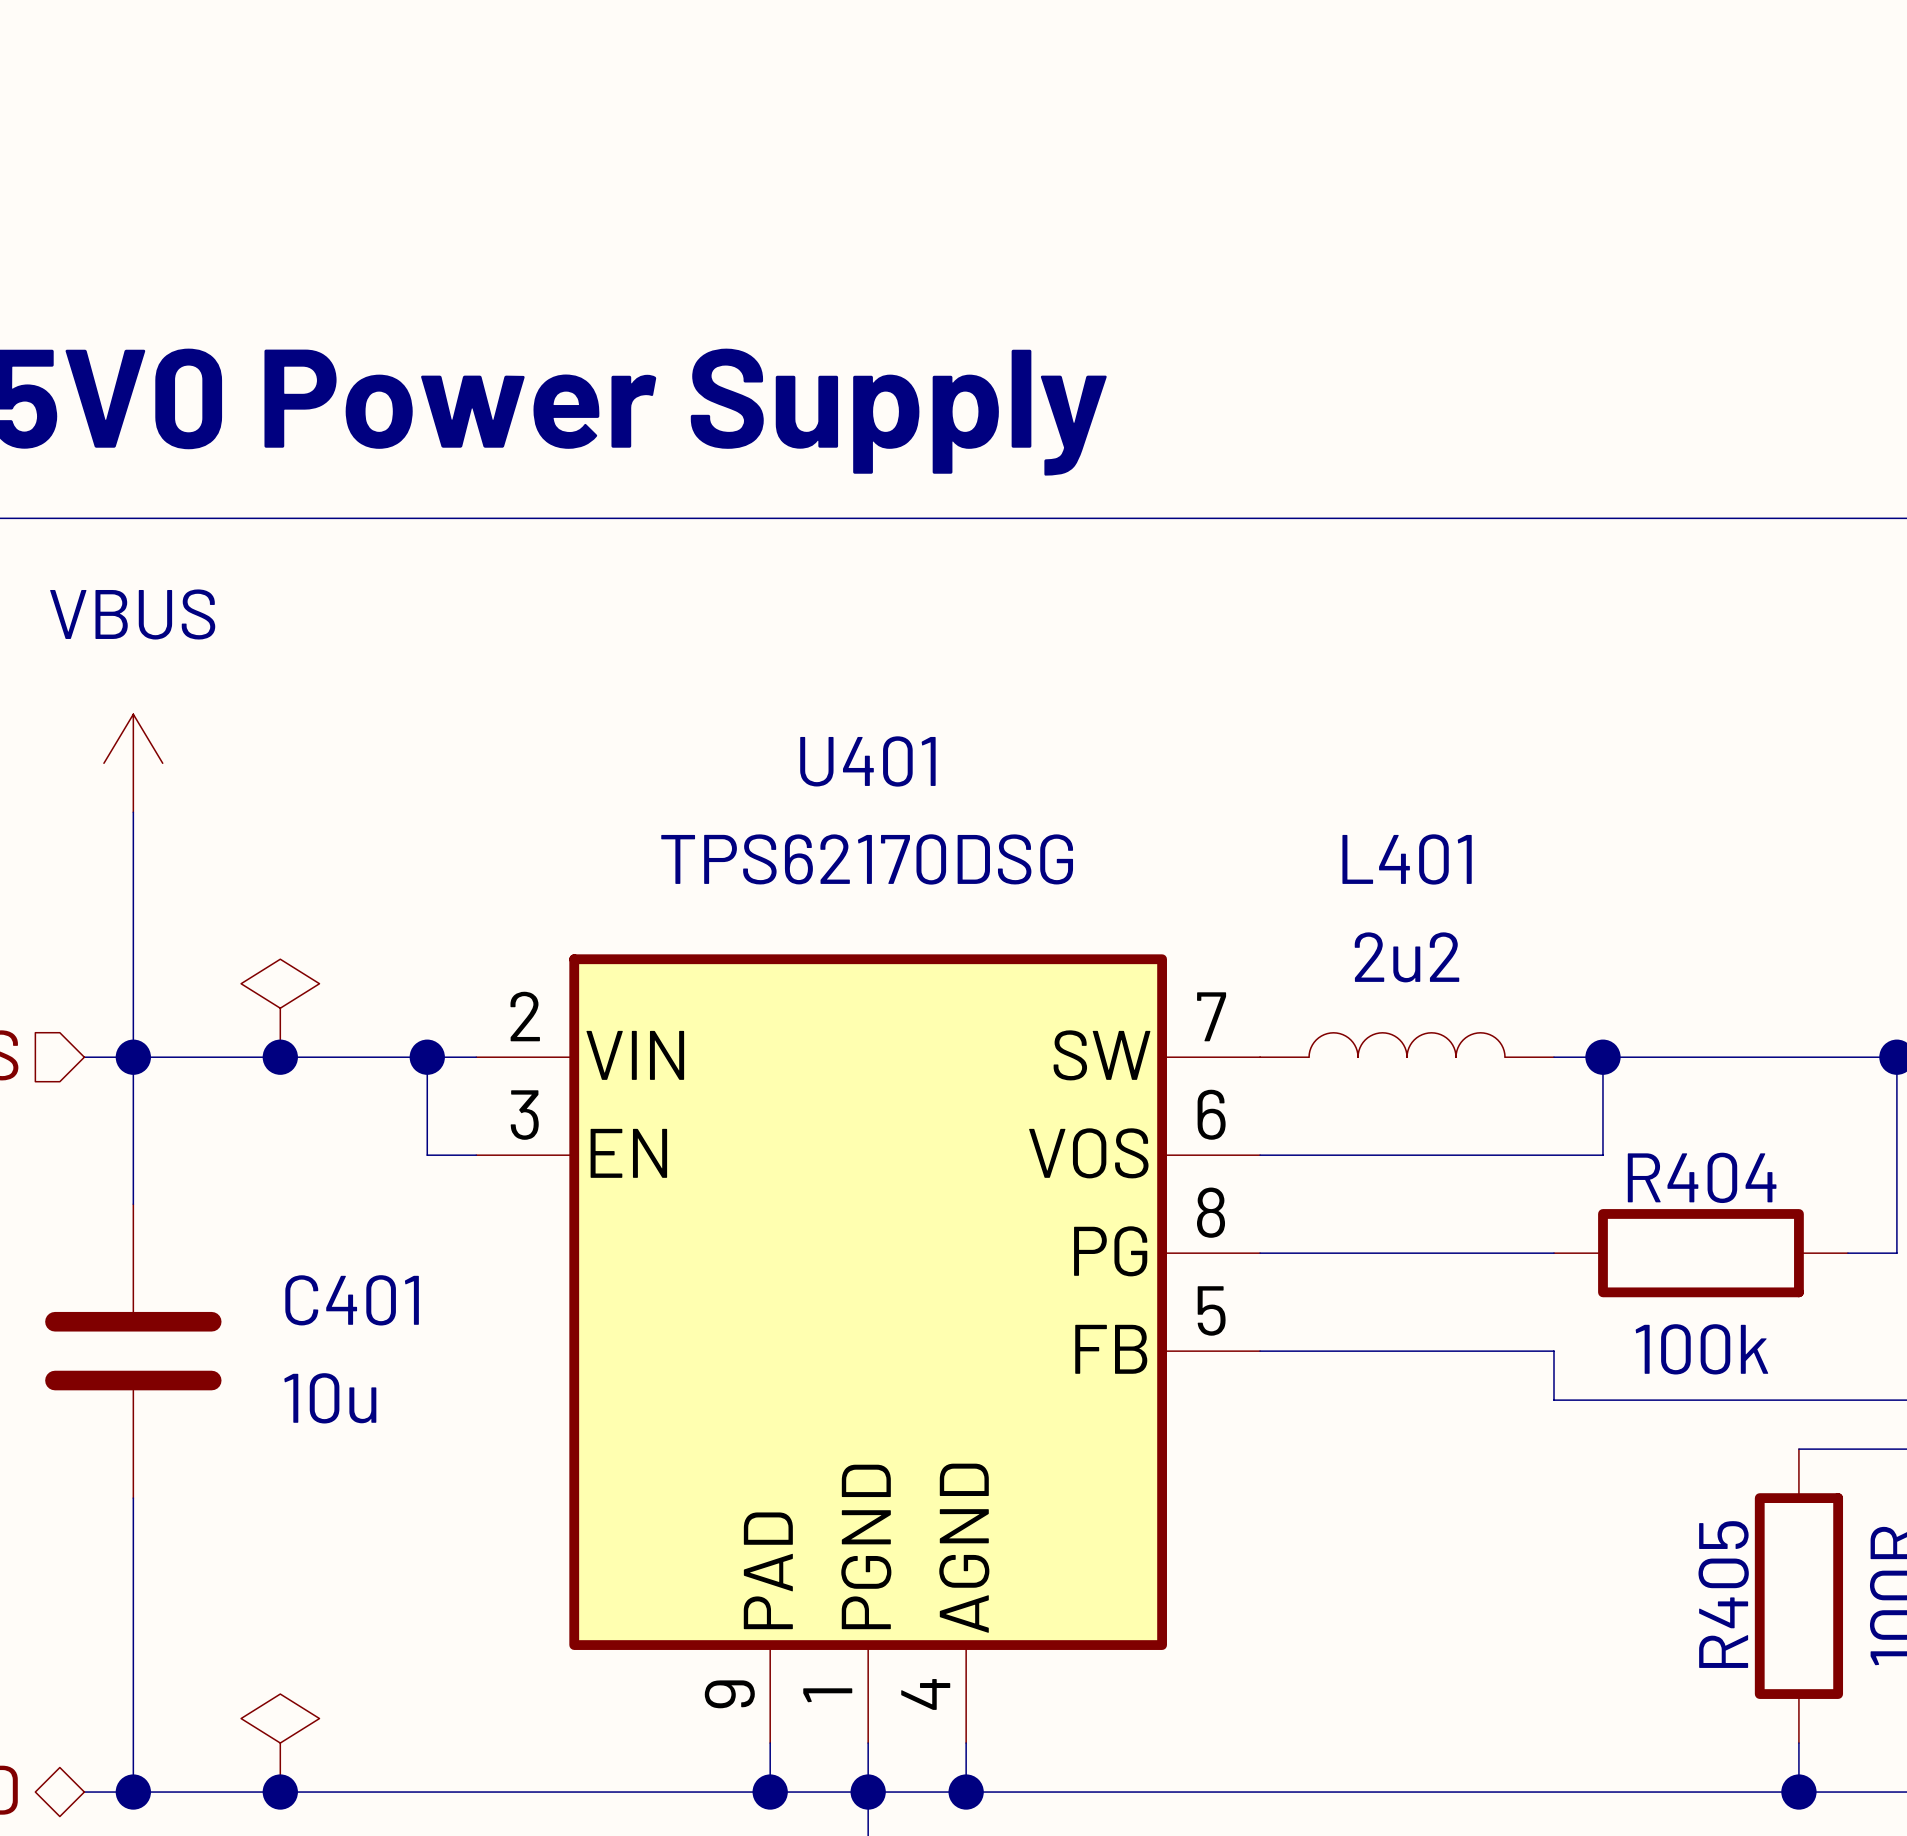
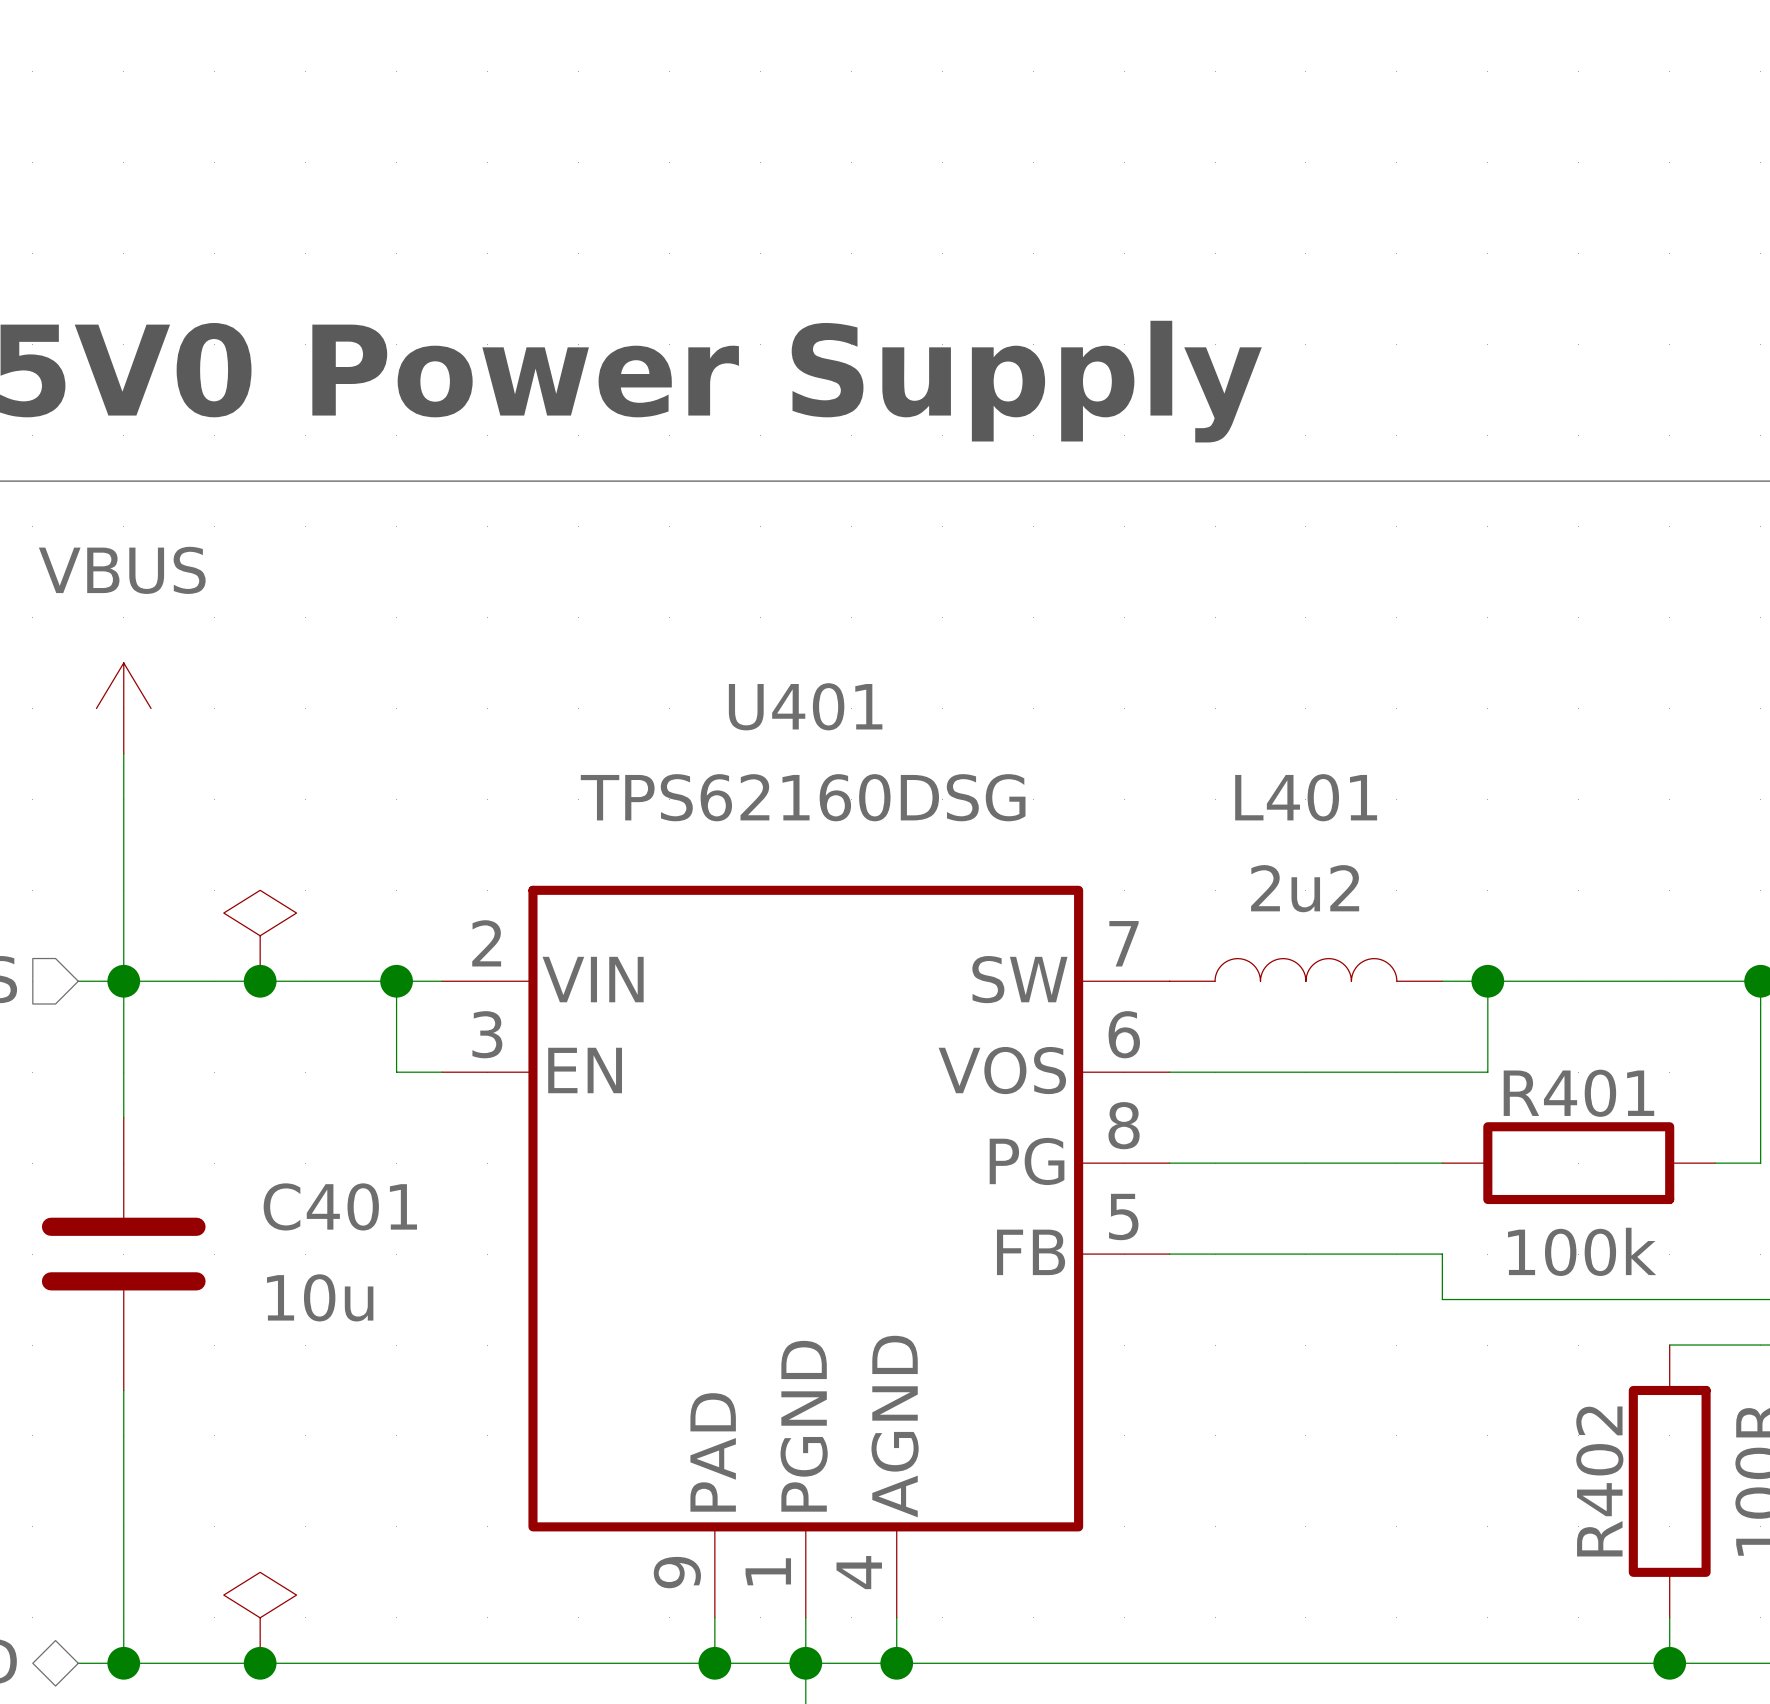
U401 value: TPS62170DSG (867, 859) -> TPS62160DSG (803, 797)
R404 name: R404 (1702, 1177) -> R401 (1578, 1093)
R405 name: R405 (1723, 1594) -> R402 (1599, 1481)

